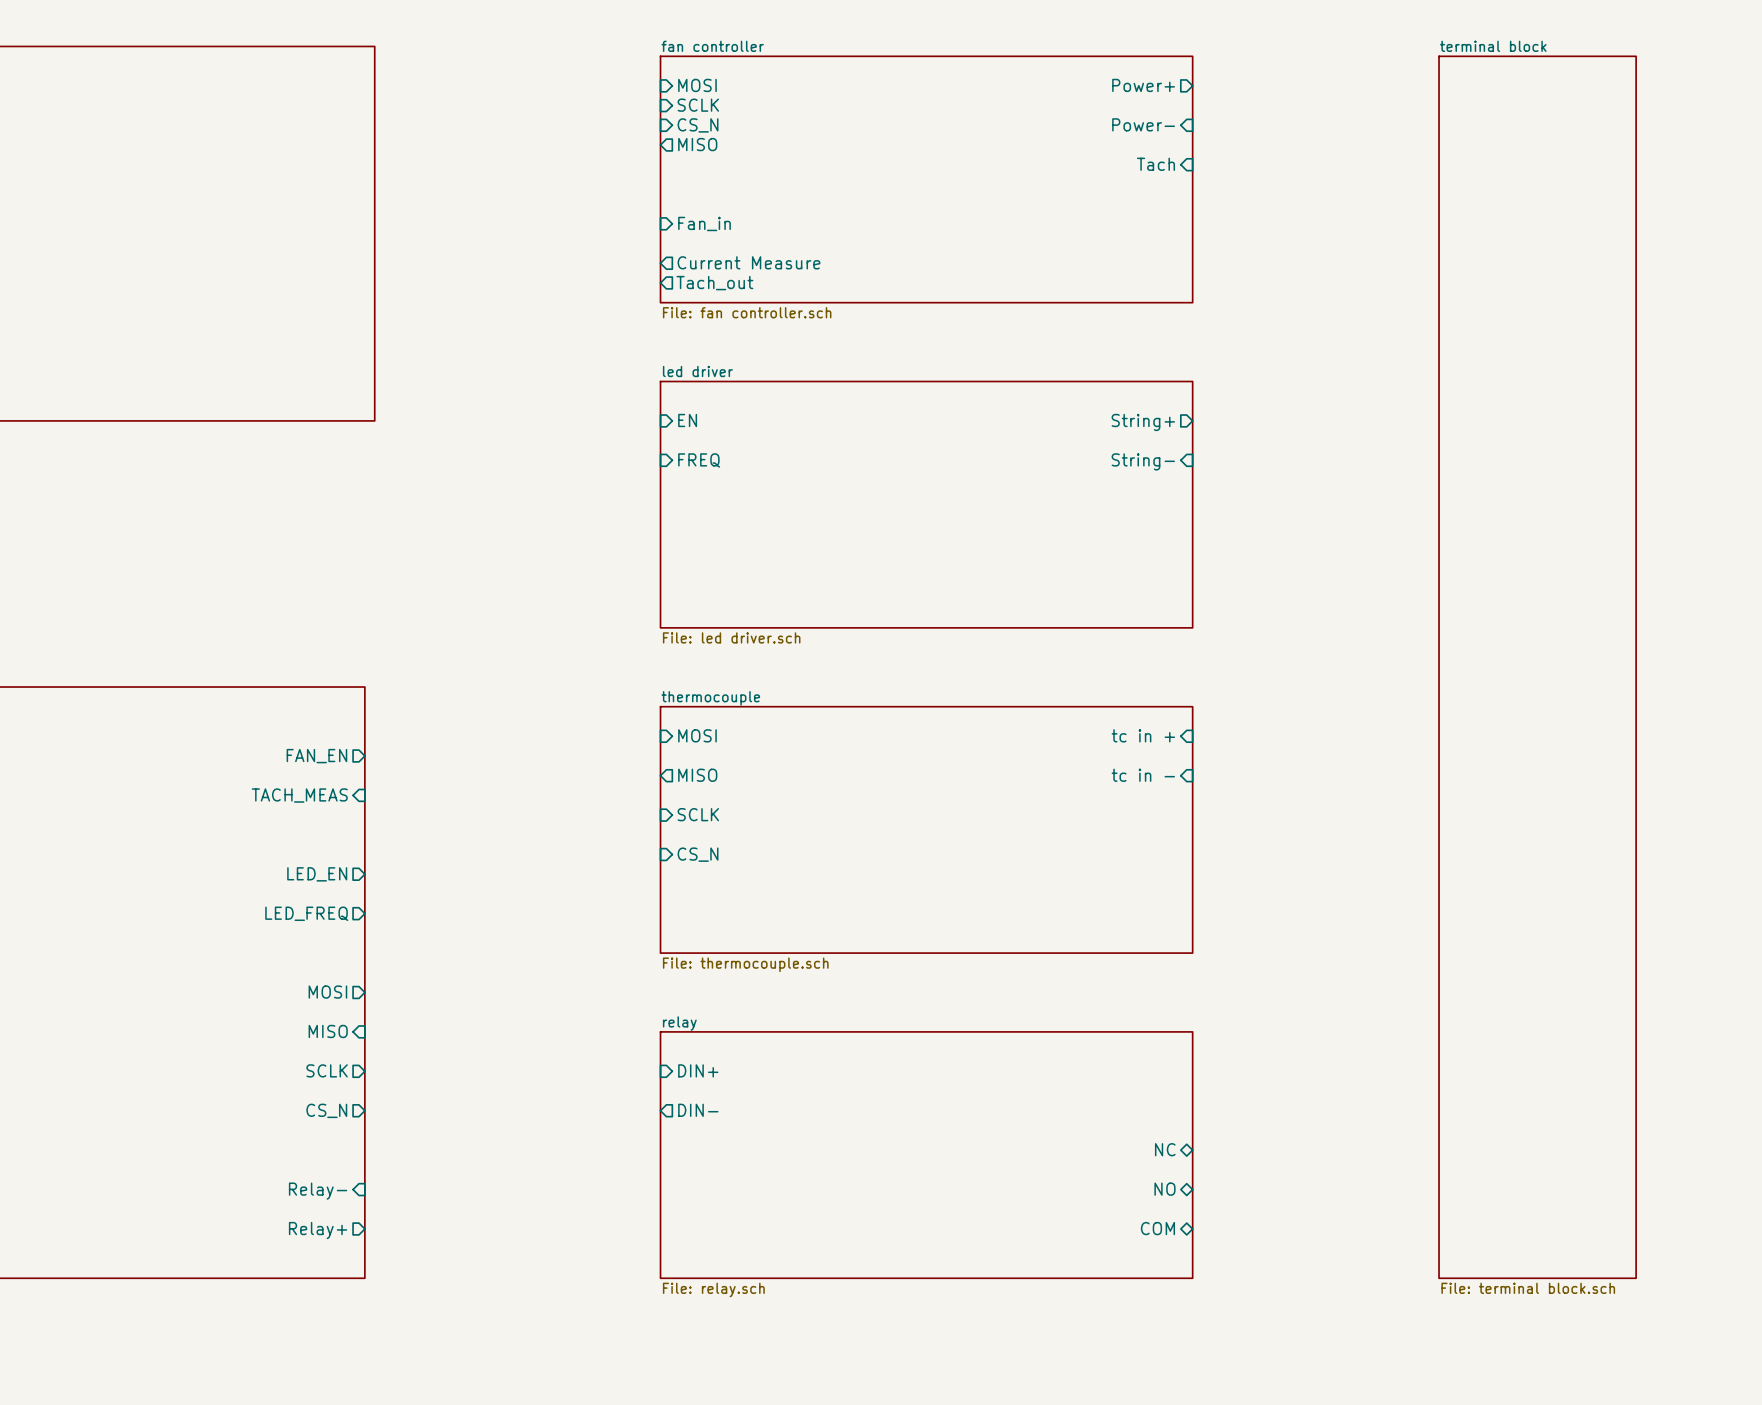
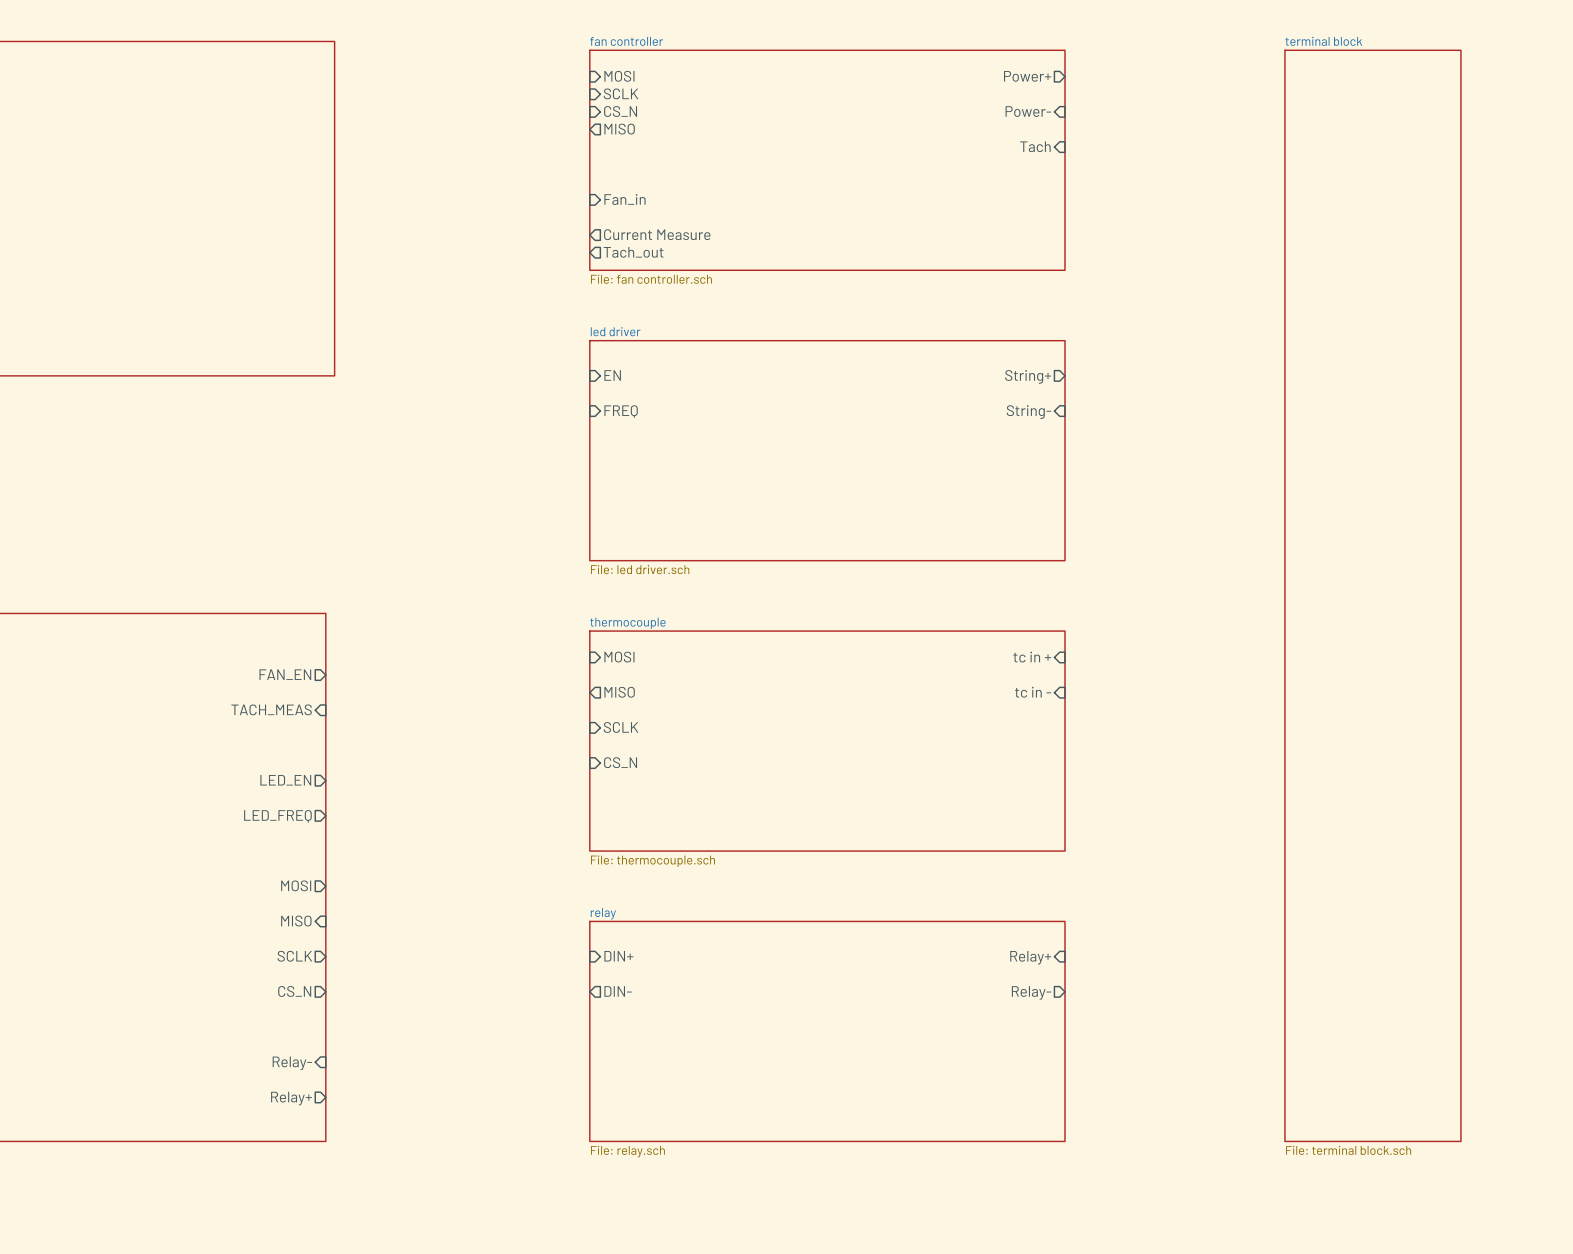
sheet pin: none -> Relay+ (1030, 957)
sheet pin: none -> Relay- (1031, 992)
sheet pin: NC (1165, 1149) -> none
sheet pin: NO (1164, 1189) -> none
sheet pin: COM (1157, 1228) -> none

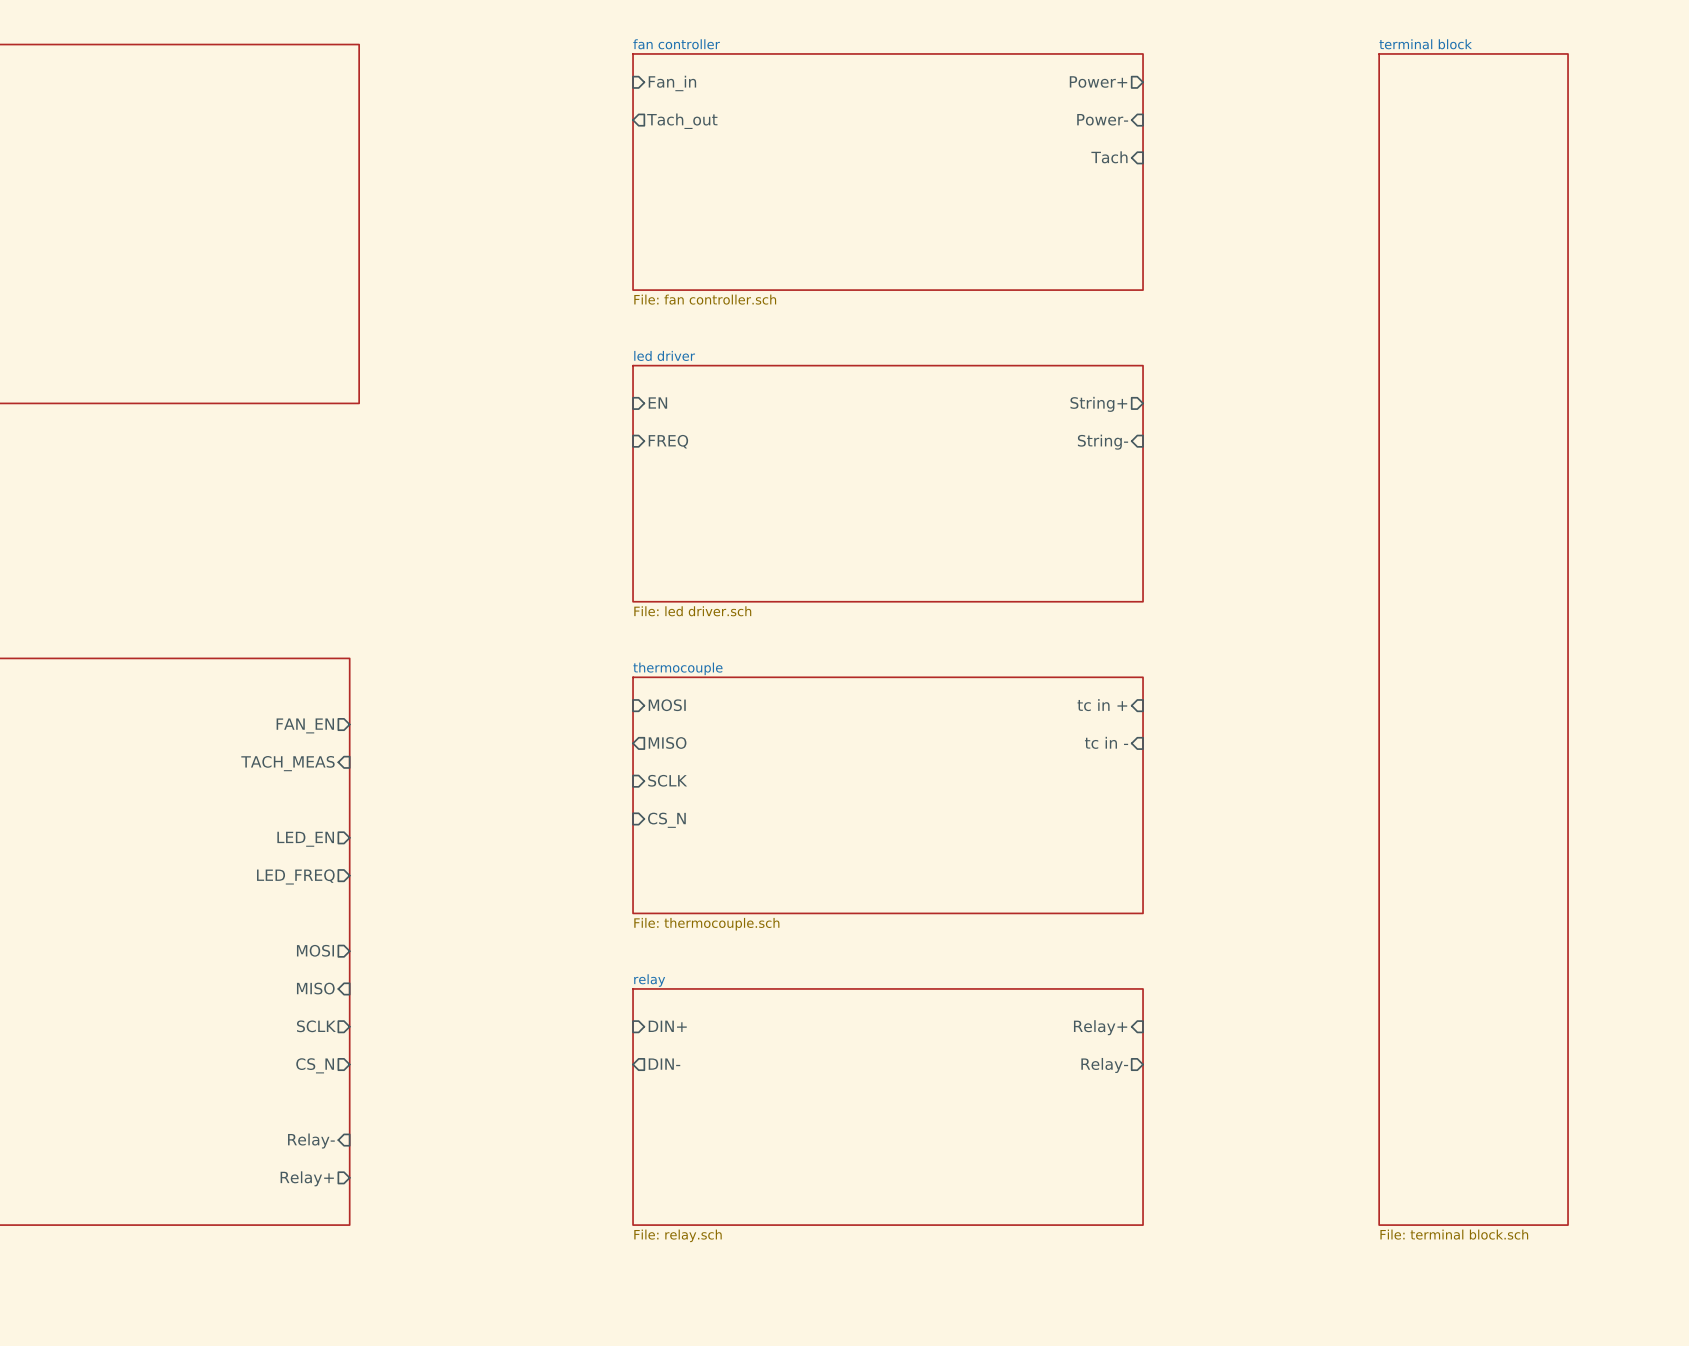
sheet pin: MOSI (619, 76) -> Fan_in (672, 83)
sheet pin: SCLK (621, 93) -> none
sheet pin shape: input (620, 111) -> output (682, 121)
sheet pin: CS_N (620, 111) -> Tach_out (682, 121)
sheet pin: MISO (619, 129) -> none
sheet pin: Fan_in (625, 199) -> none
sheet pin: Current Measure (657, 234) -> none
sheet pin: Tach_out (633, 252) -> none

